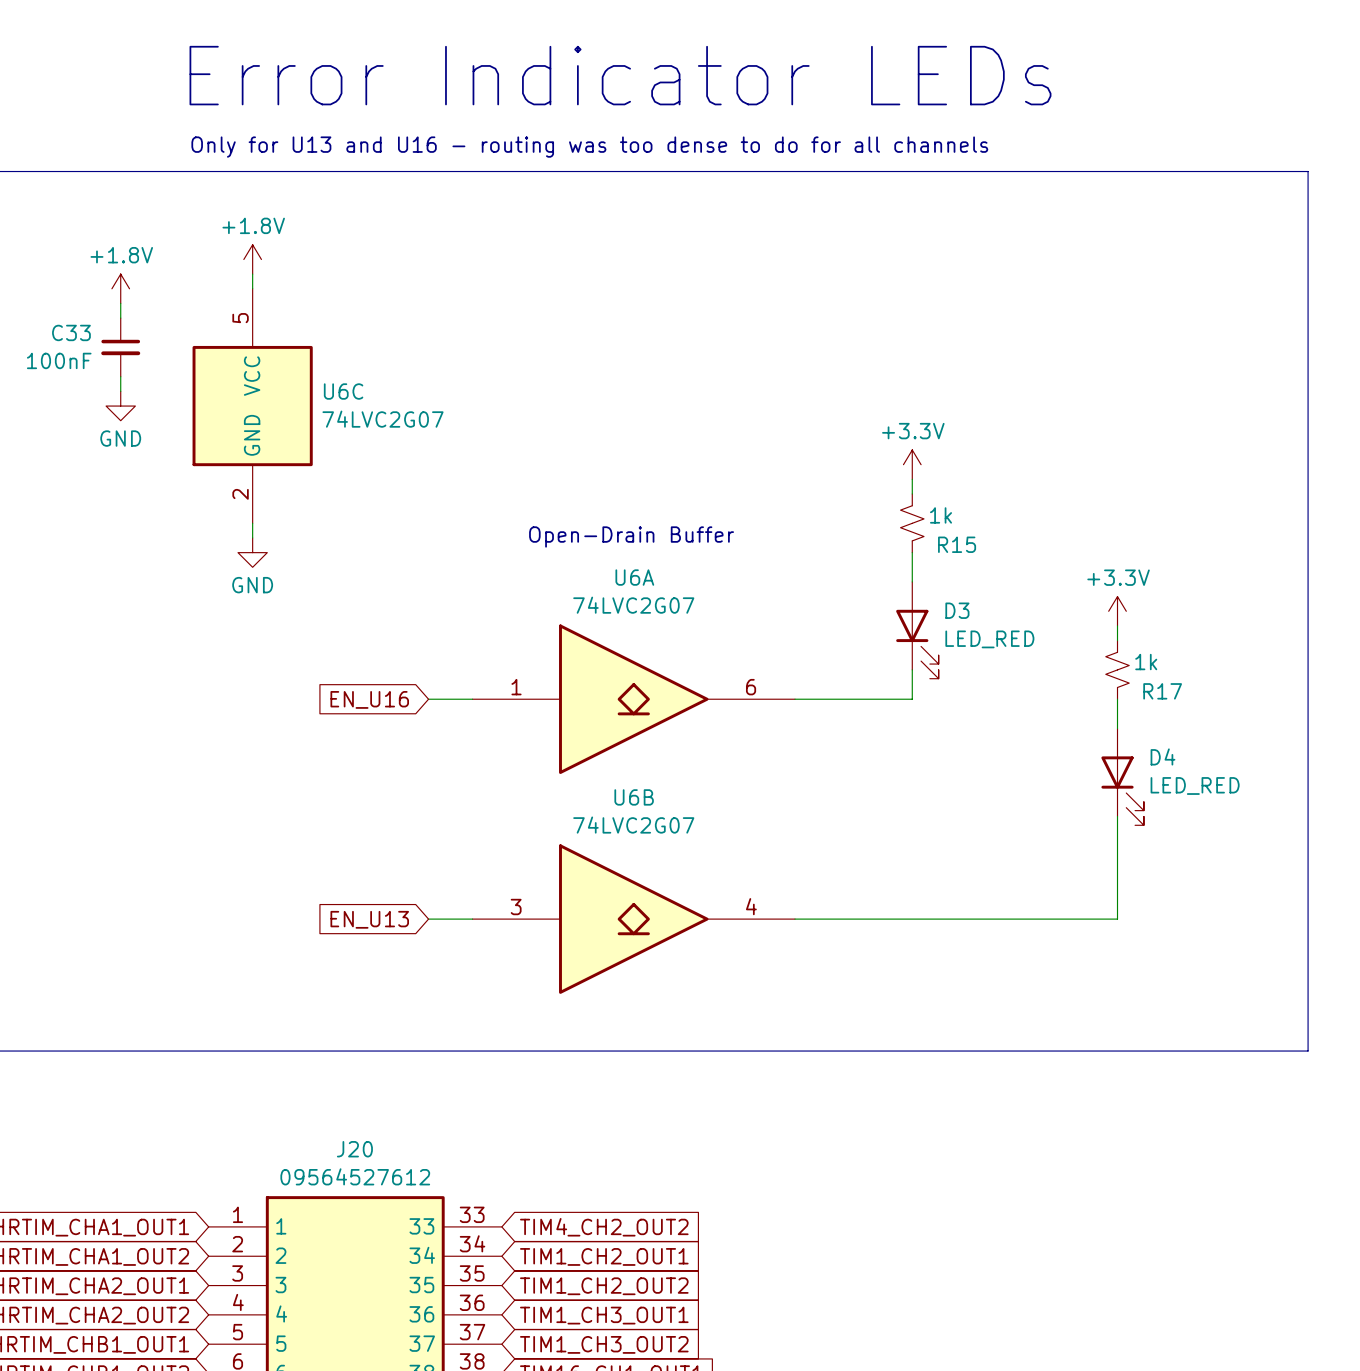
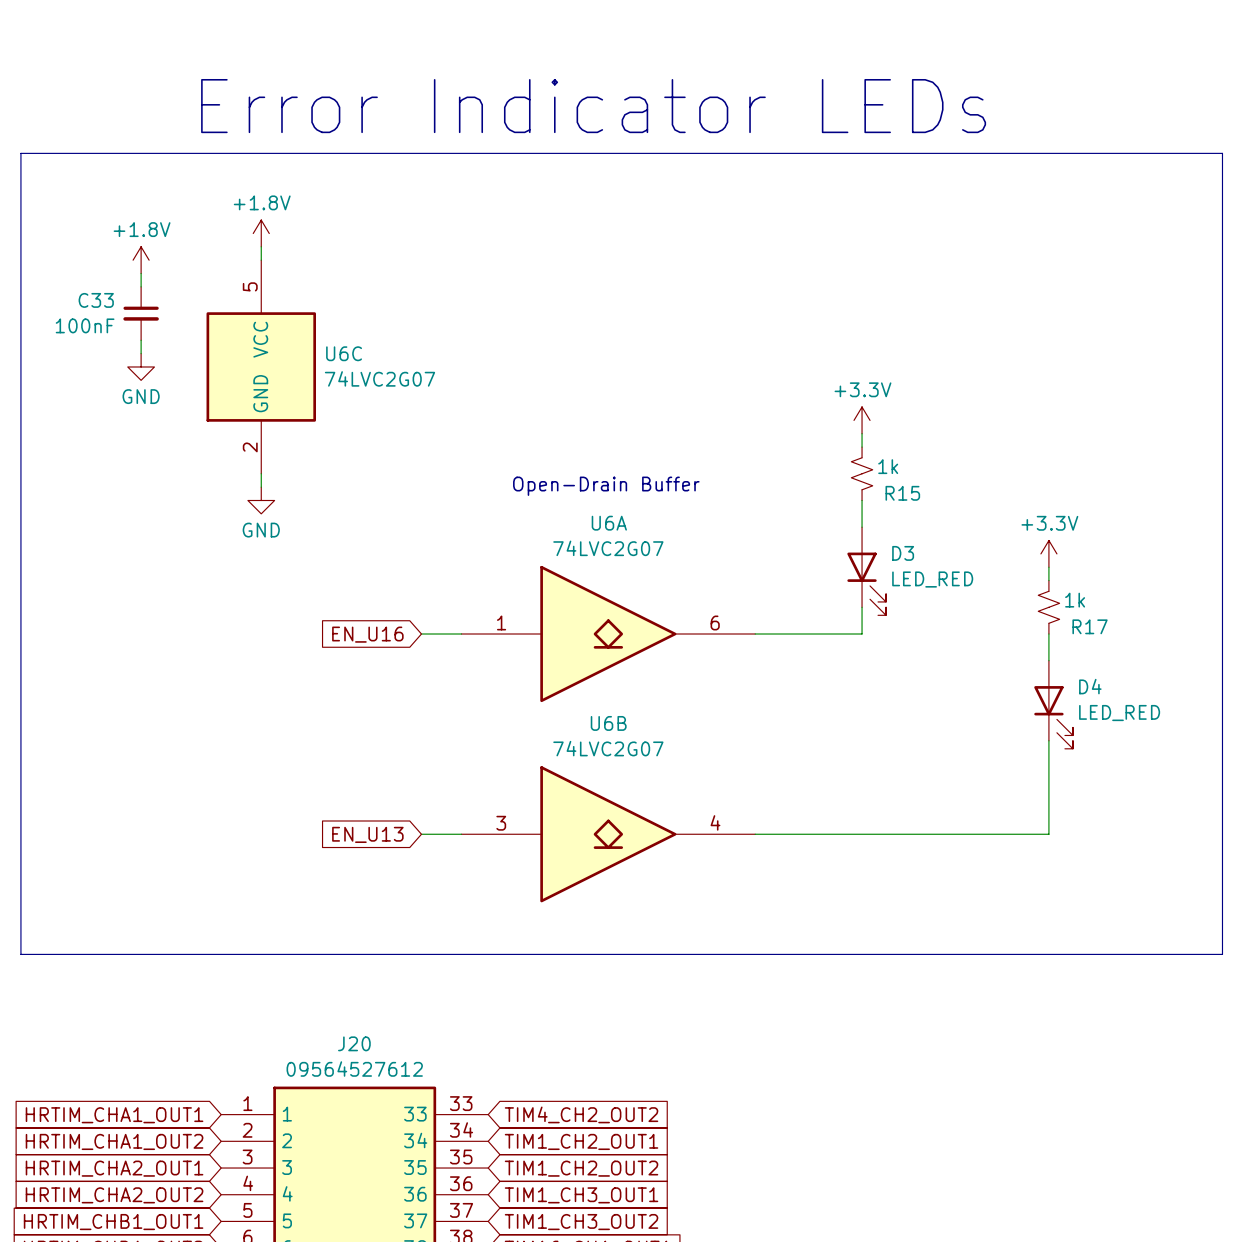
text position: Error Indicator LEDs (620, 75) -> Error Indicator LEDs (593, 106)
text: Only for U13 and U16 - routing was too dense to do for all channels (589, 147) -> none

